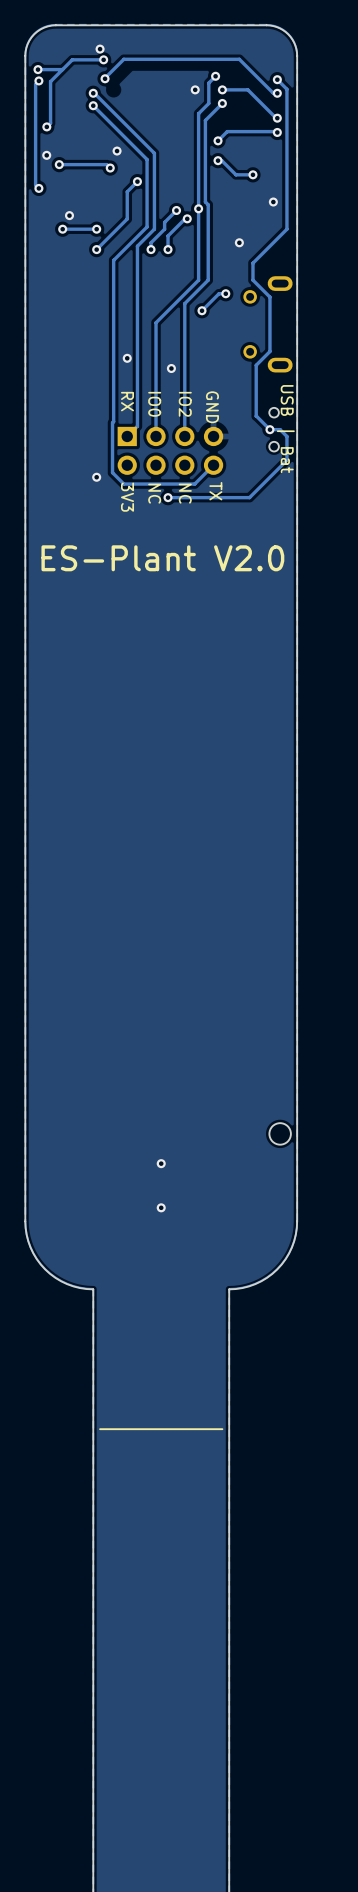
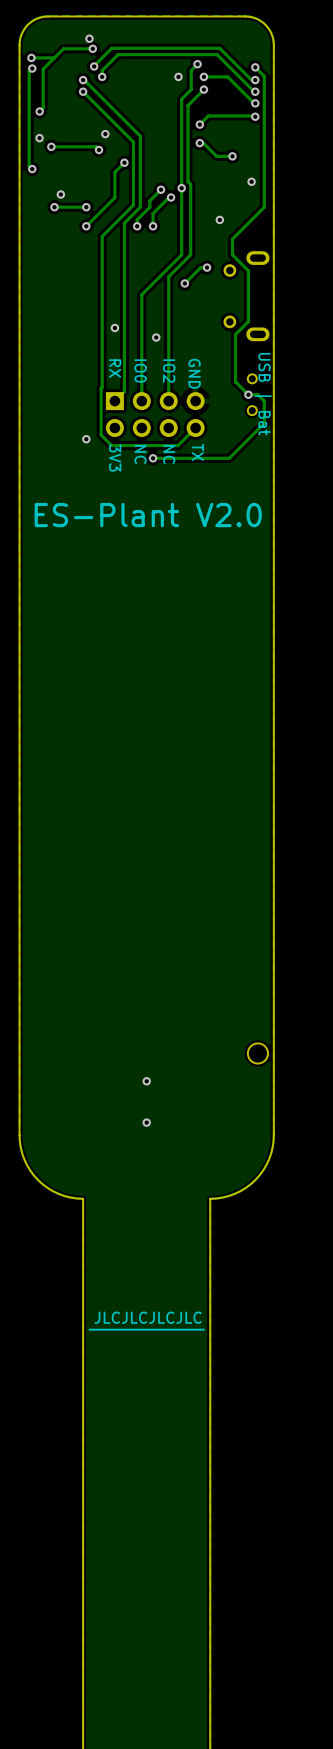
track: none -> (102, 76) (102, 70) (118, 54) (217, 54) (255, 91)
via: none -> (102, 76)
via: none -> (255, 91)
text: none -> JLCJLCJLCJLC (148, 1317)

